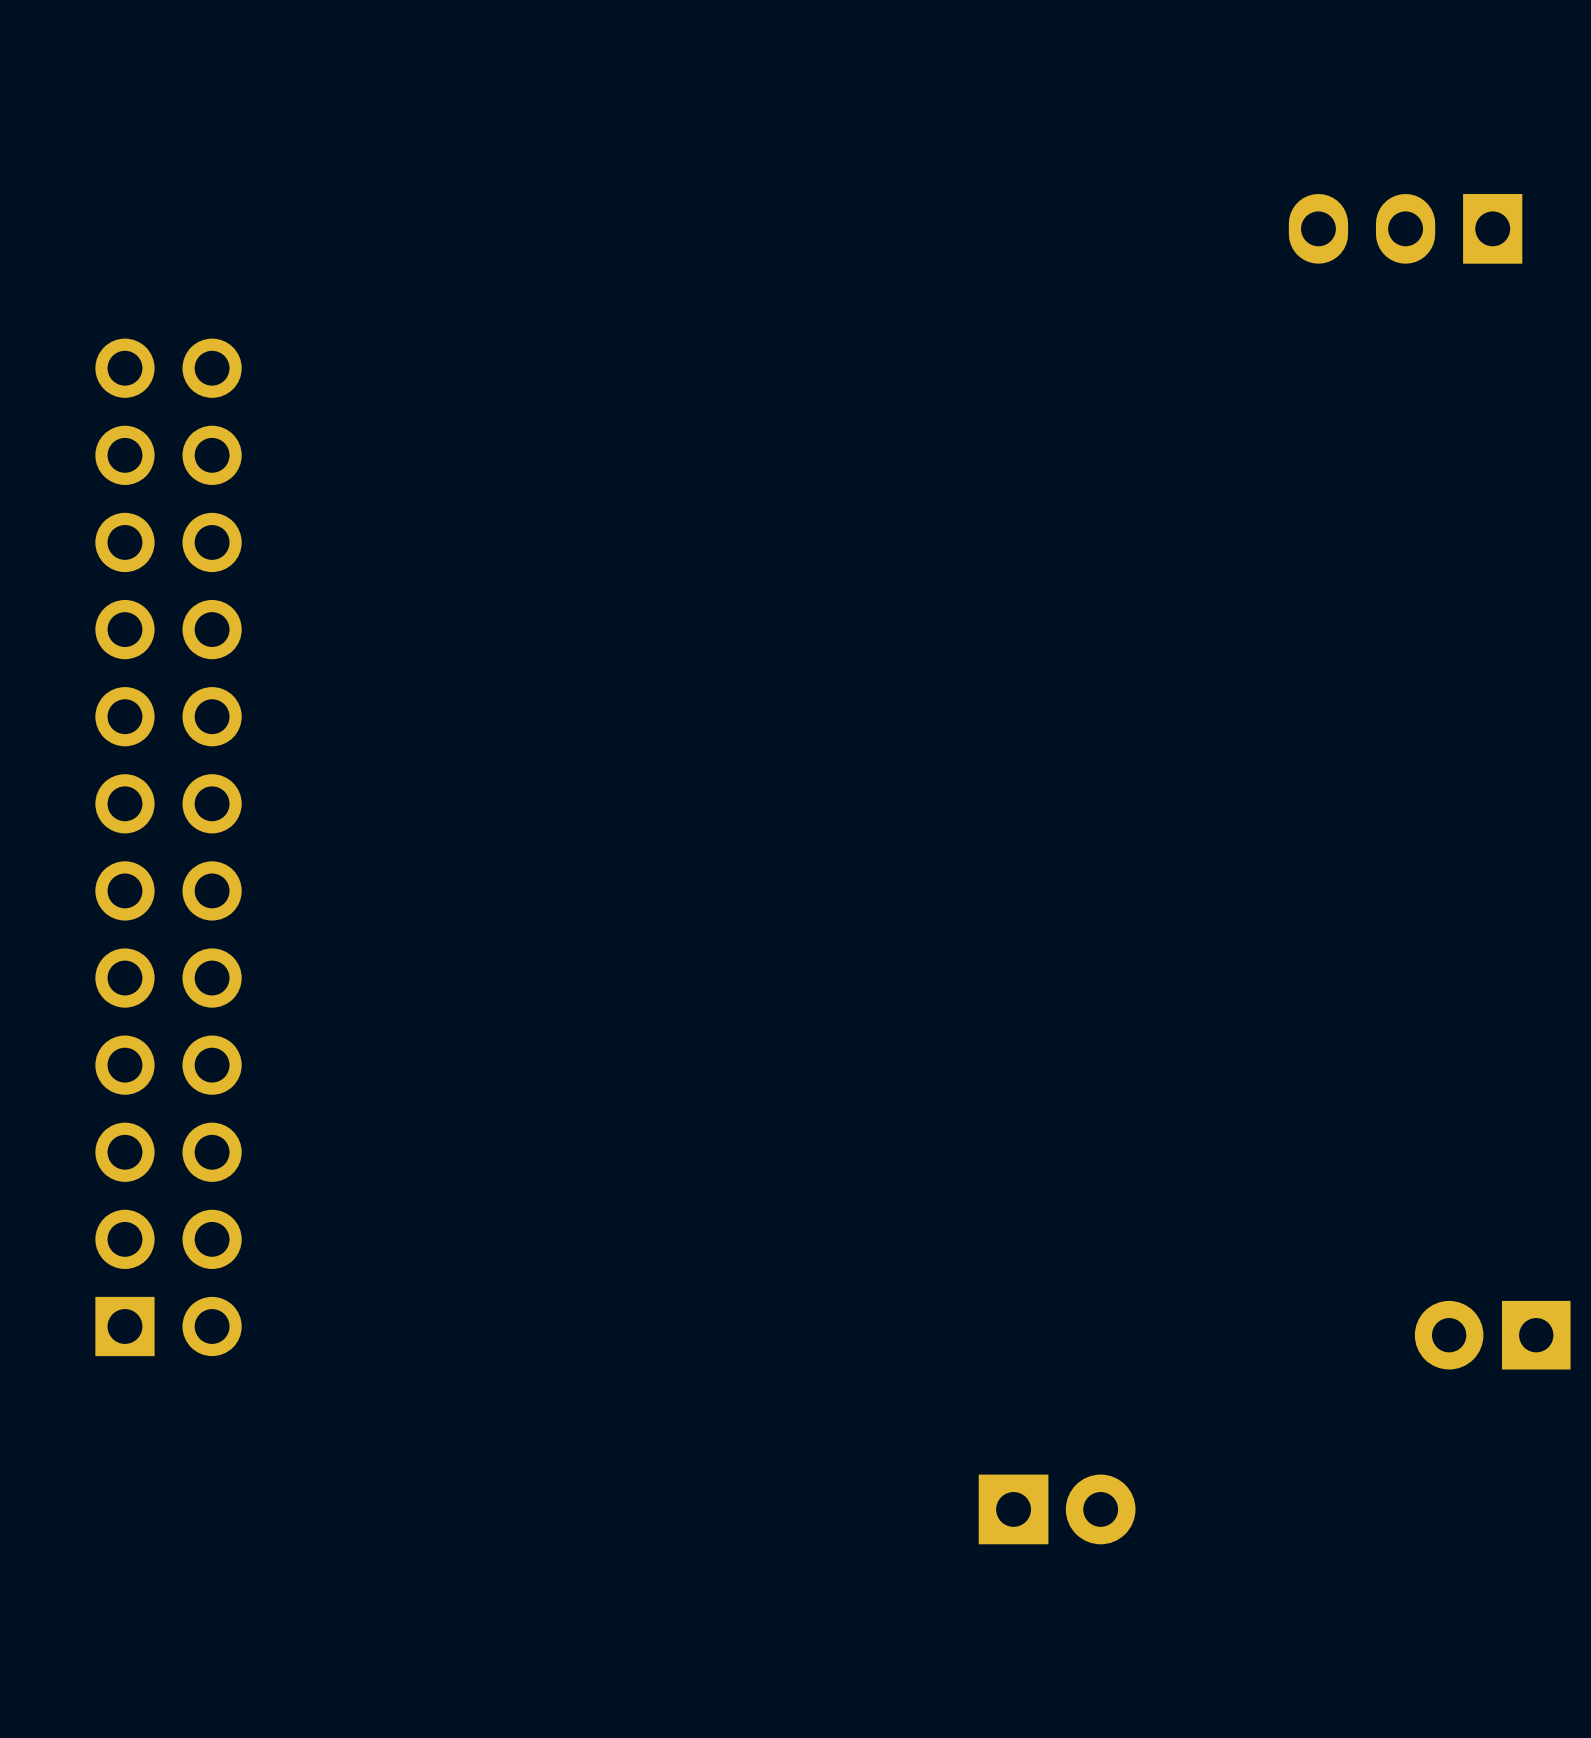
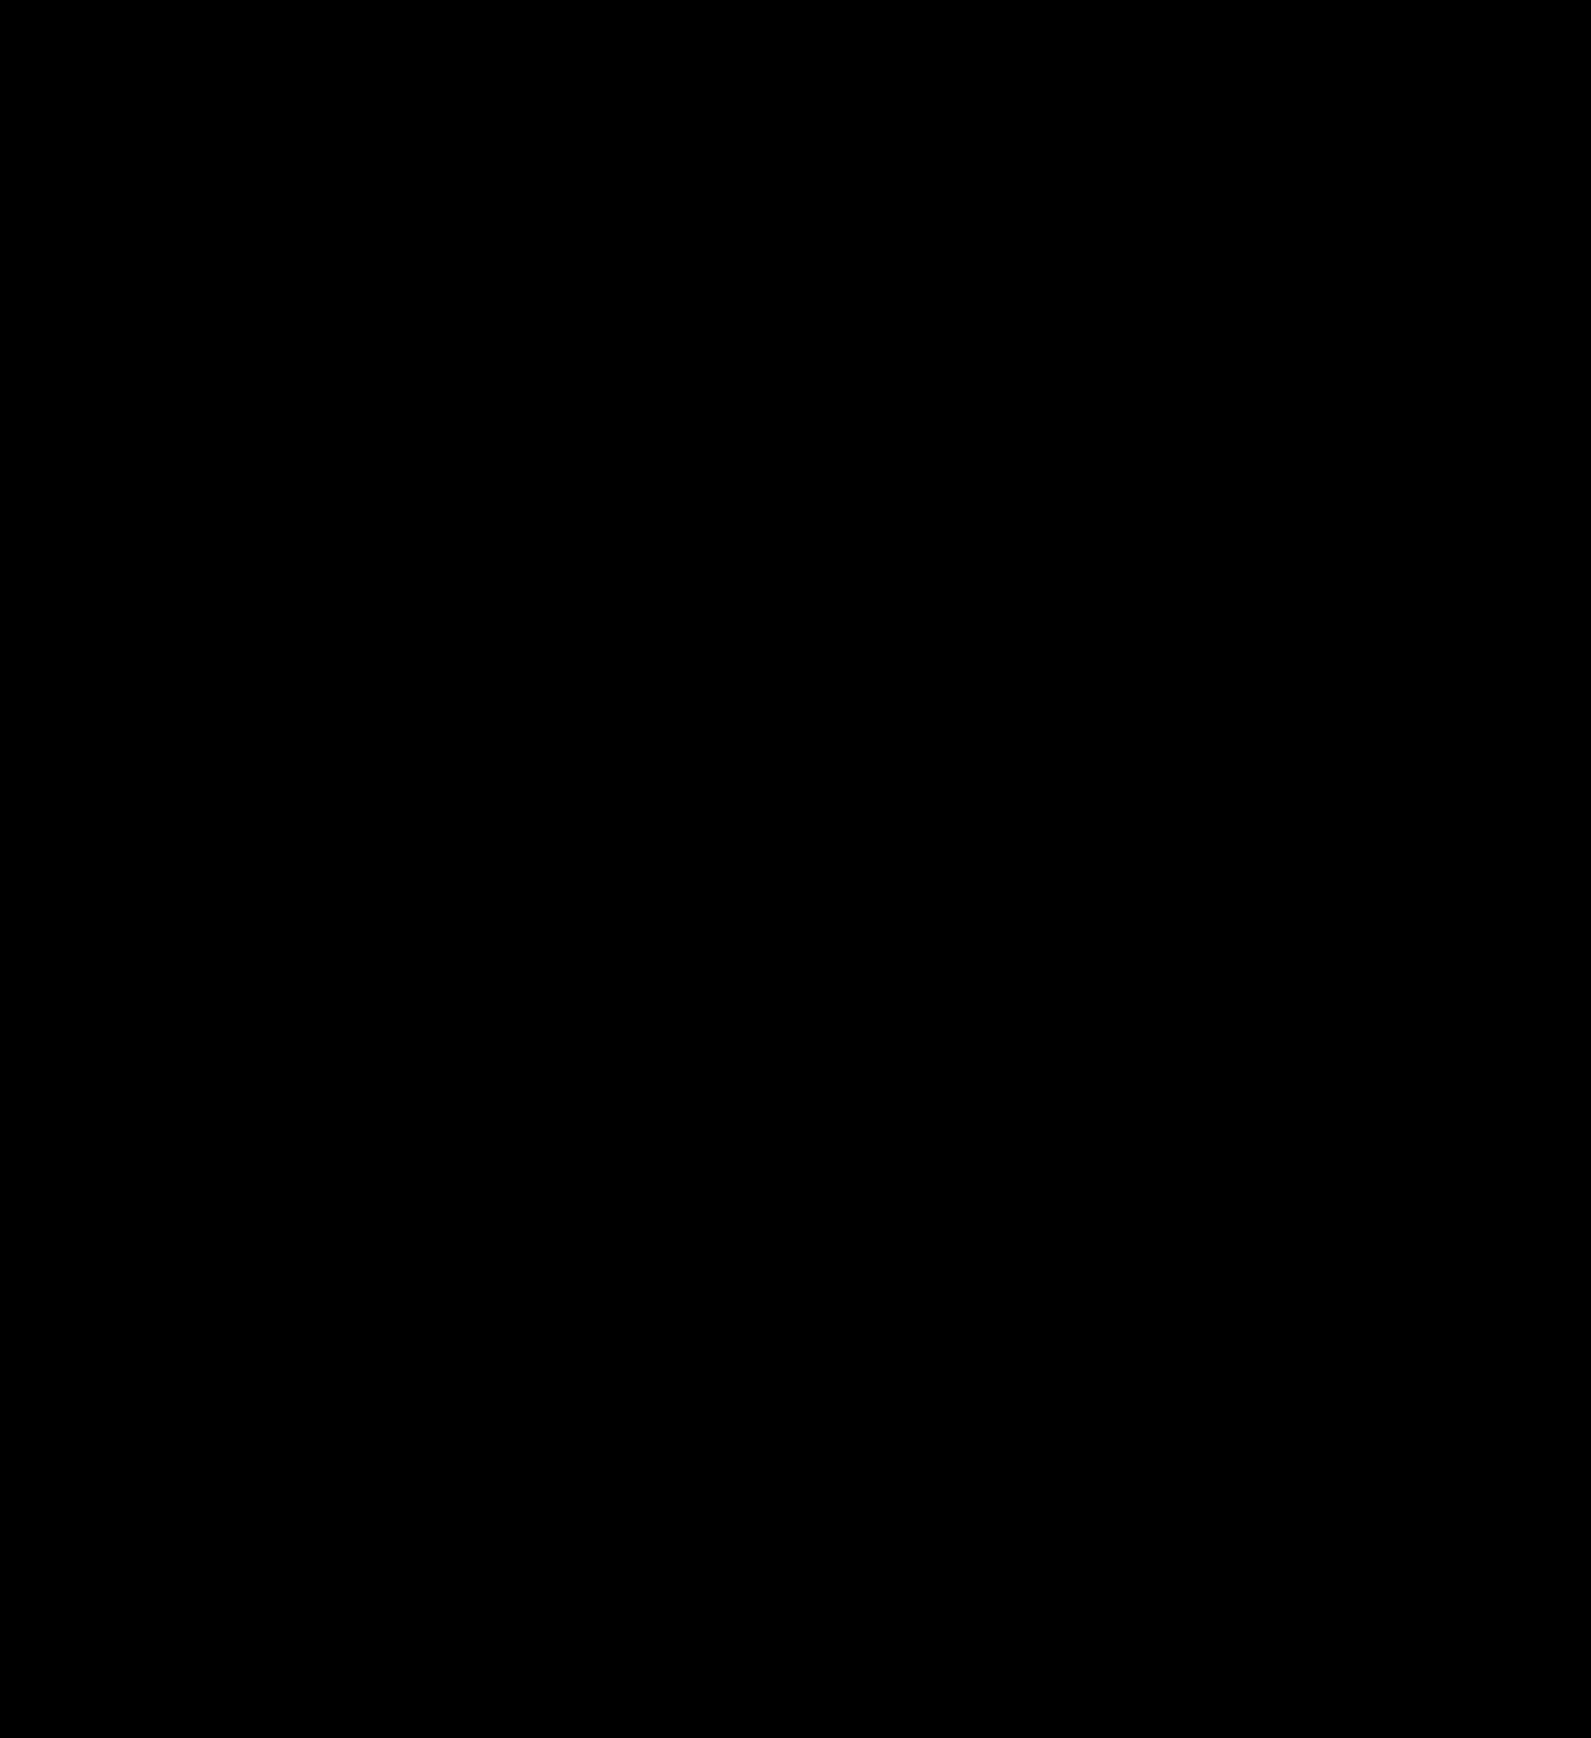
part: (1405, 228) -> none
part: (168, 847) -> none
part: (1492, 1335) -> none
part: (1057, 1509) -> none

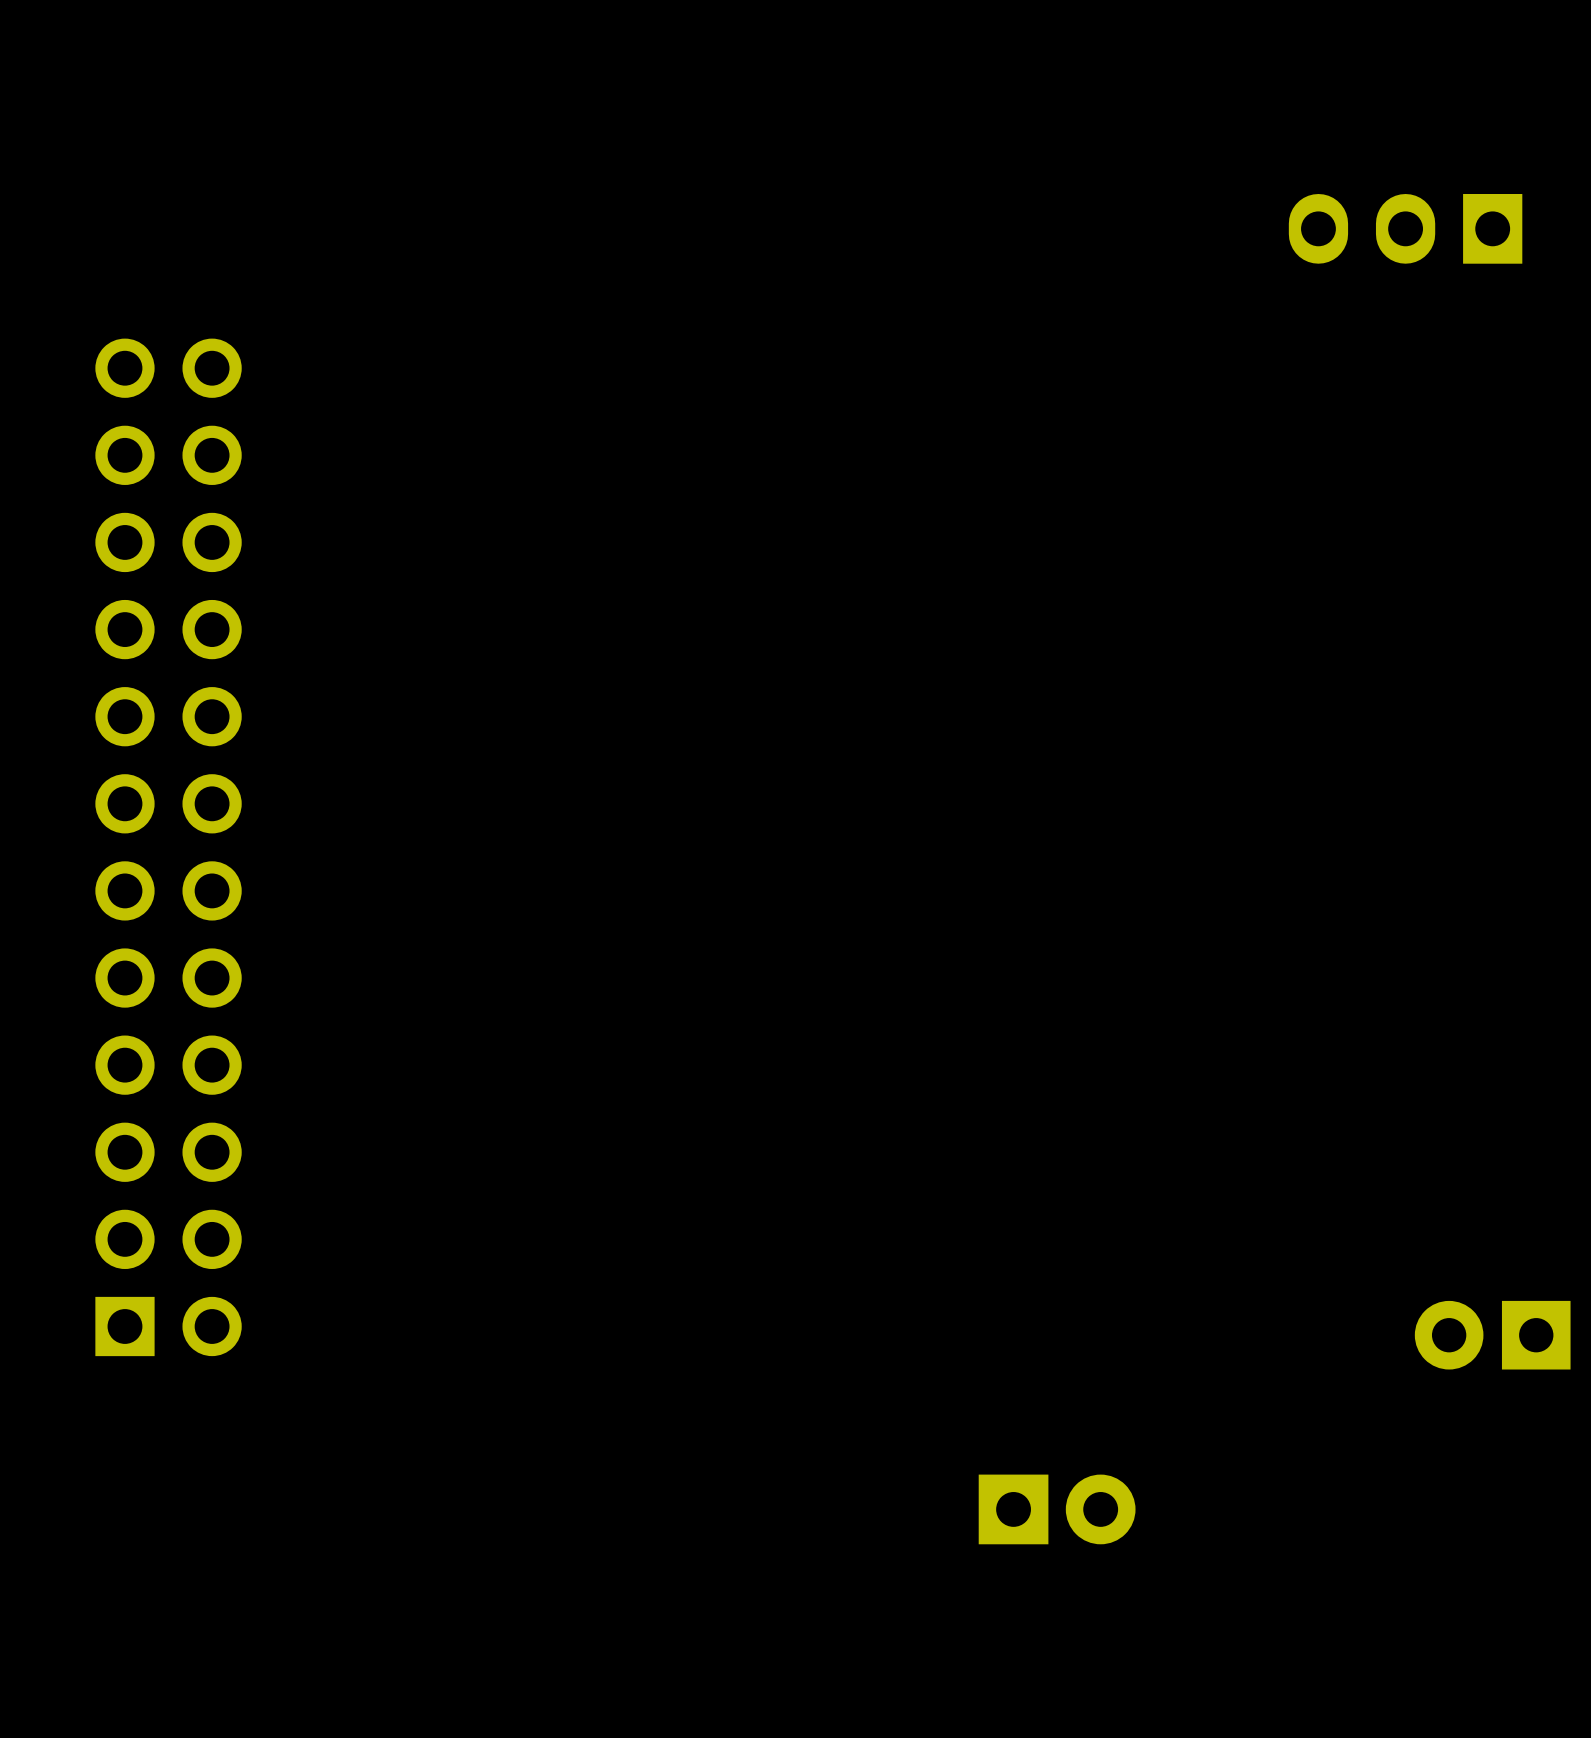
part: none -> (1405, 228)
part: none -> (168, 847)
part: none -> (1492, 1335)
part: none -> (1057, 1509)

